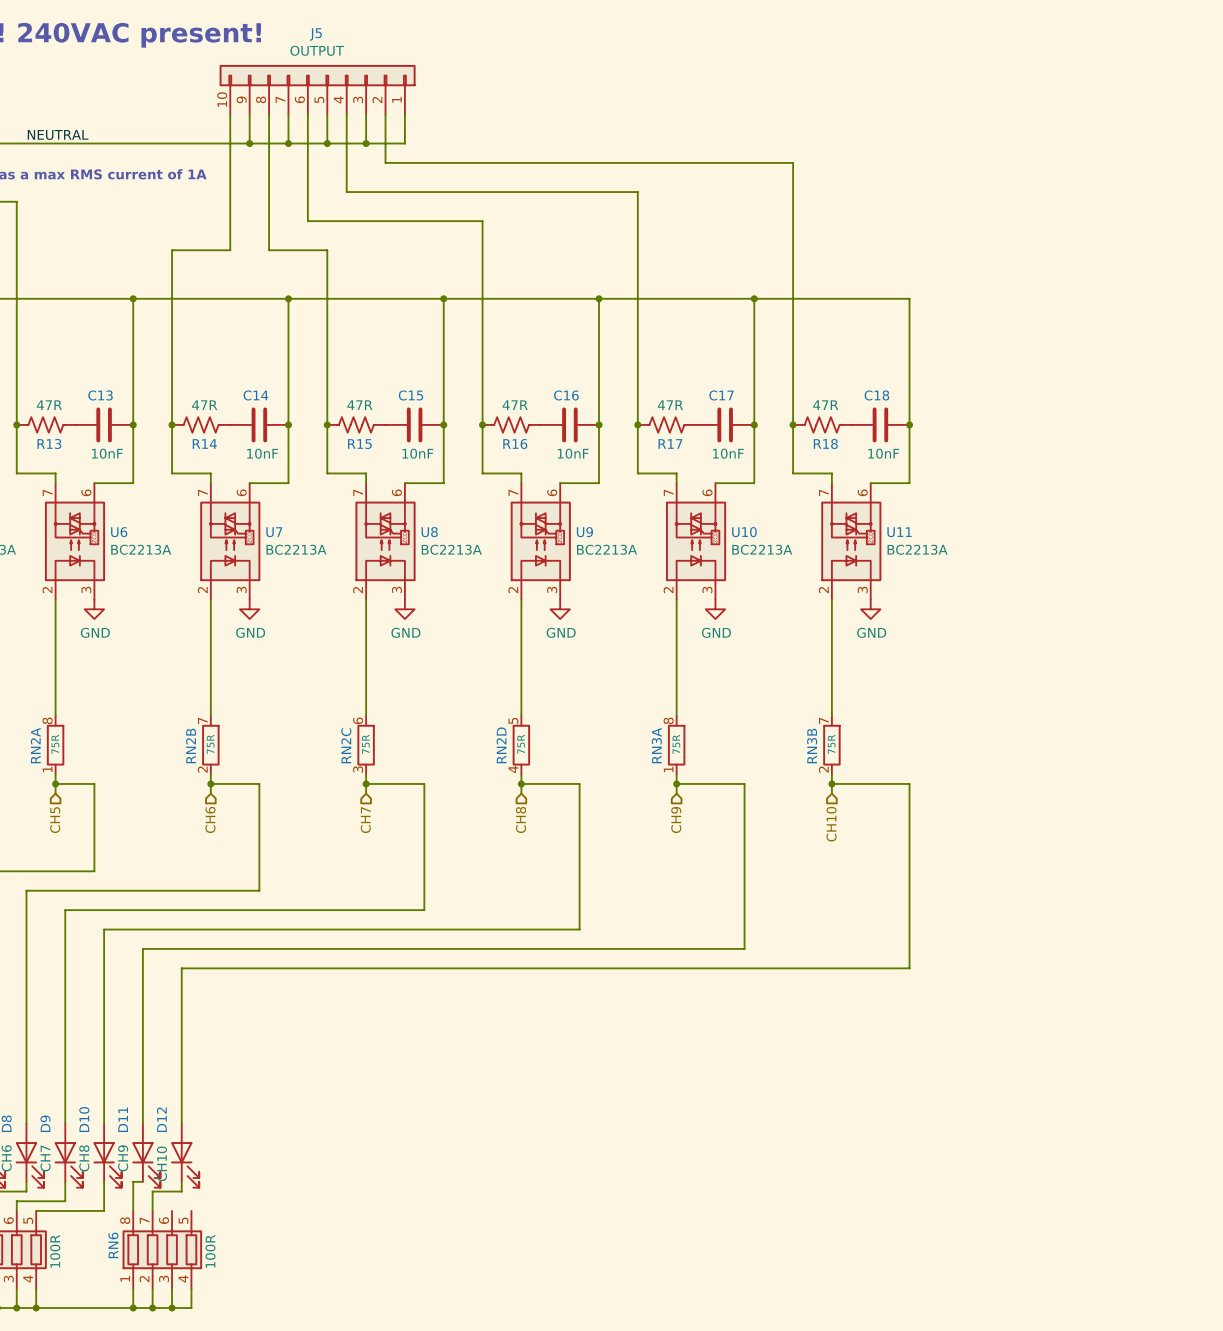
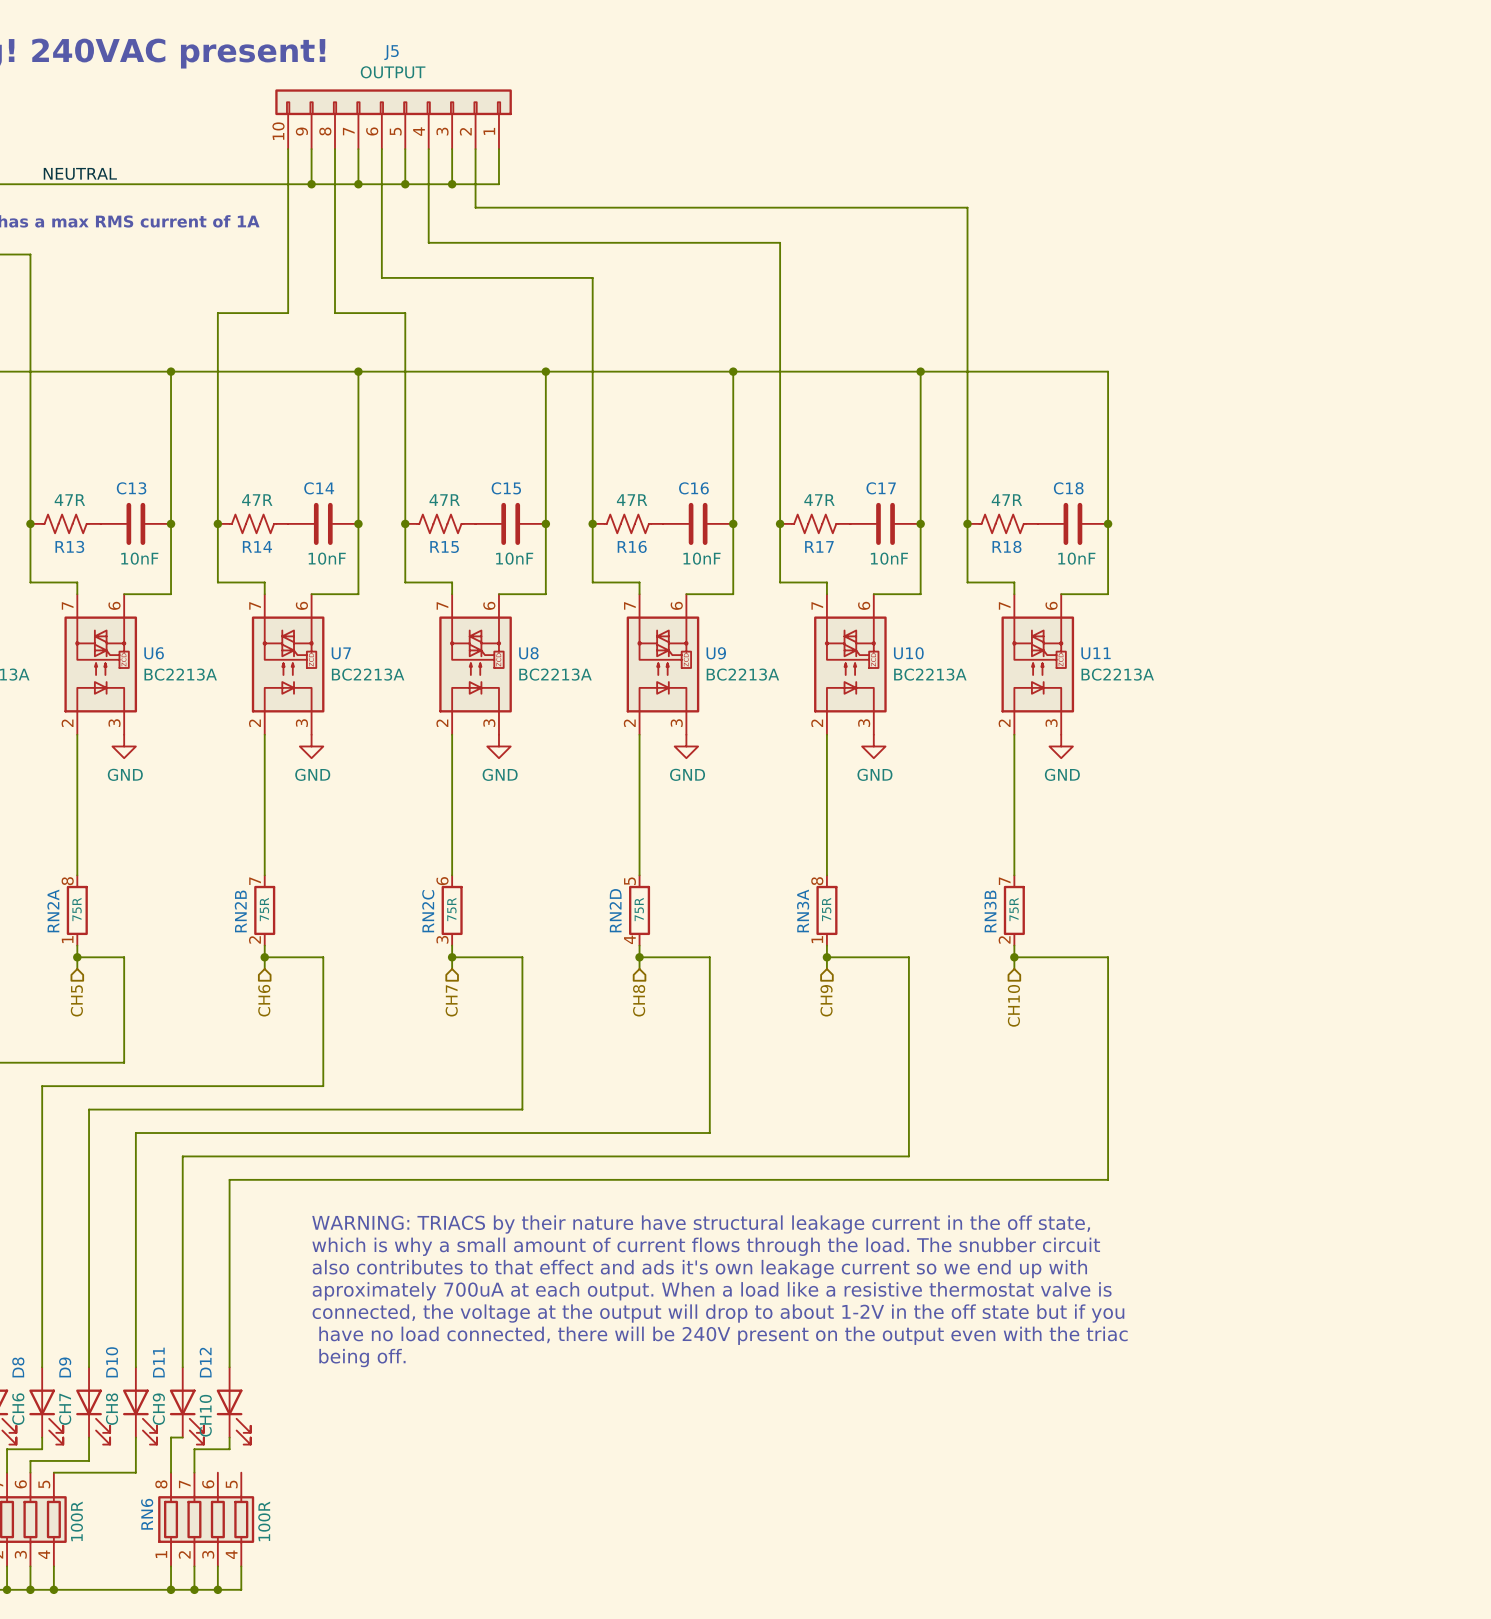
text: none -> WARNING: TRIACS by their nature have structural leakage current in the off state, (701, 1224)
text: none -> which is why a small amount of current flows through the load. The snubber circuit (706, 1246)
text: none -> also contributes to that effect and ads it's own leakage current so we end up with (699, 1269)
text: none -> aproximately 700uA at each output. When a load like a resistive thermostat valve is (712, 1291)
text: none -> connected, the voltage at the output will drop to about 1-2V in the off state but if you (718, 1313)
text: none -> have no load connected, there will be 240V present on the output even with the triac (723, 1335)
text: none -> being off. (362, 1358)

